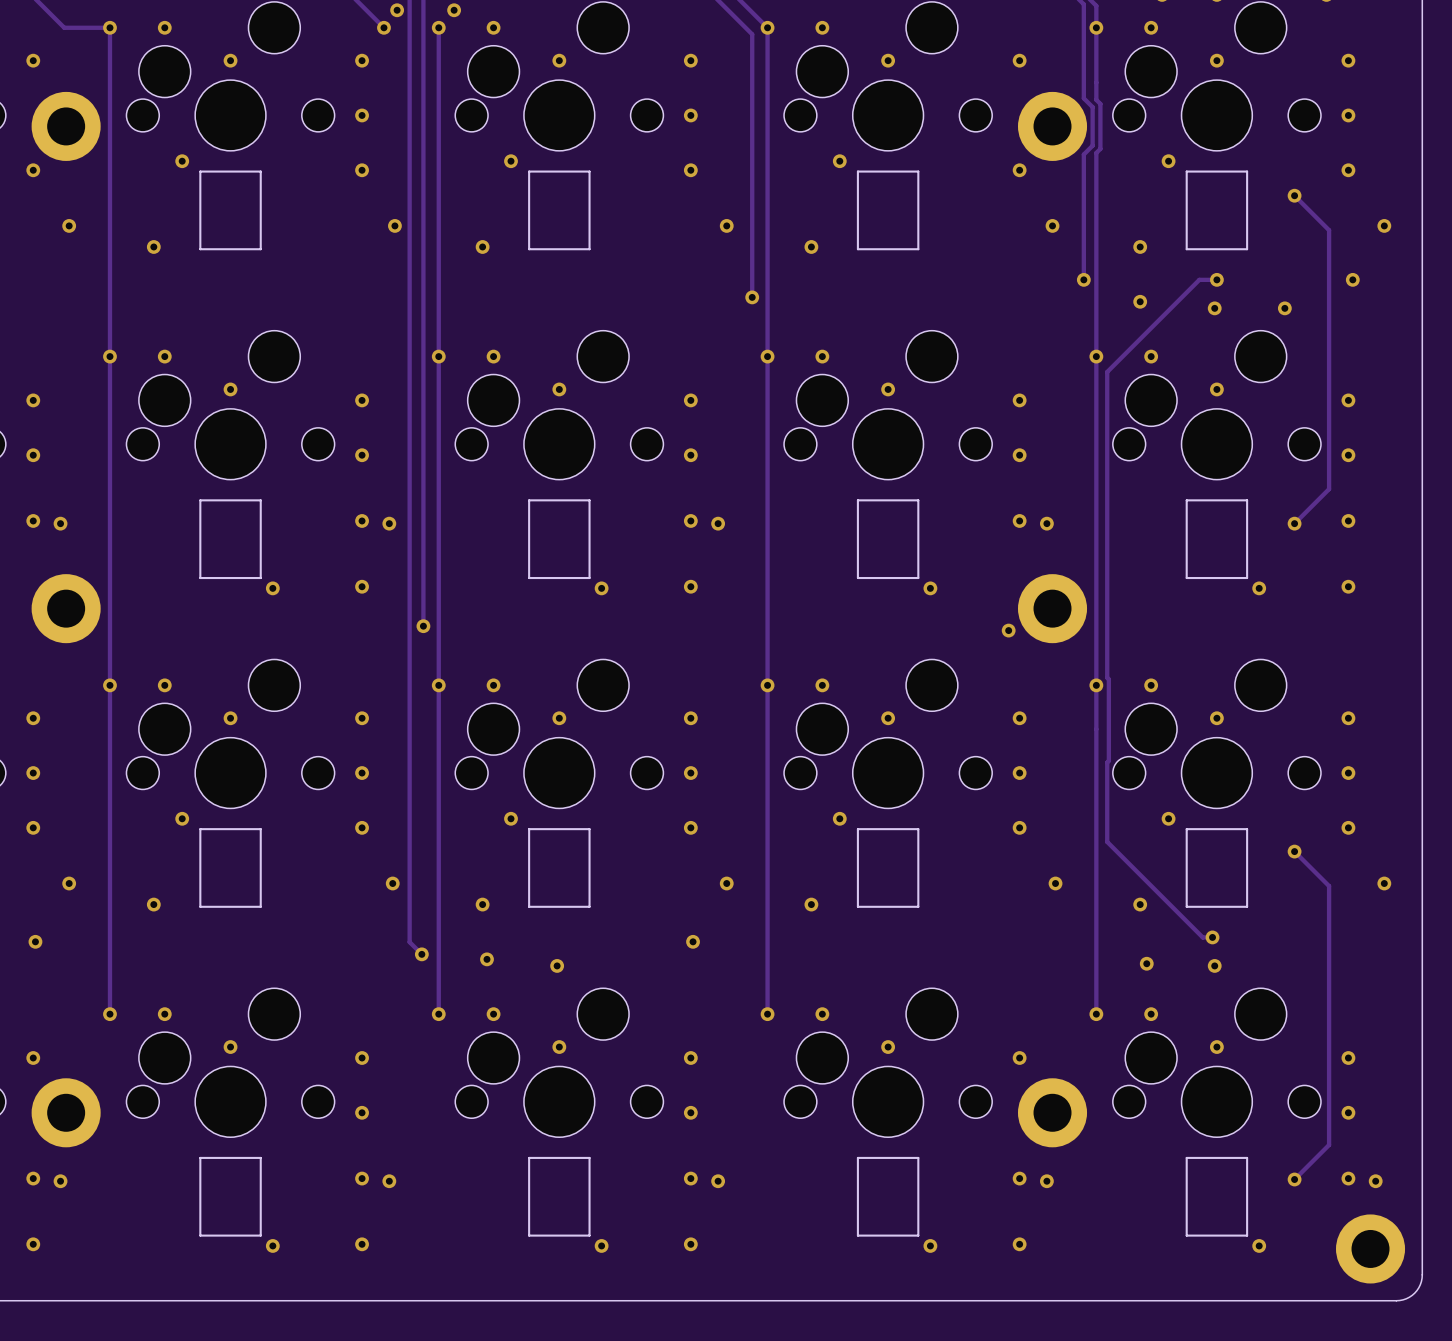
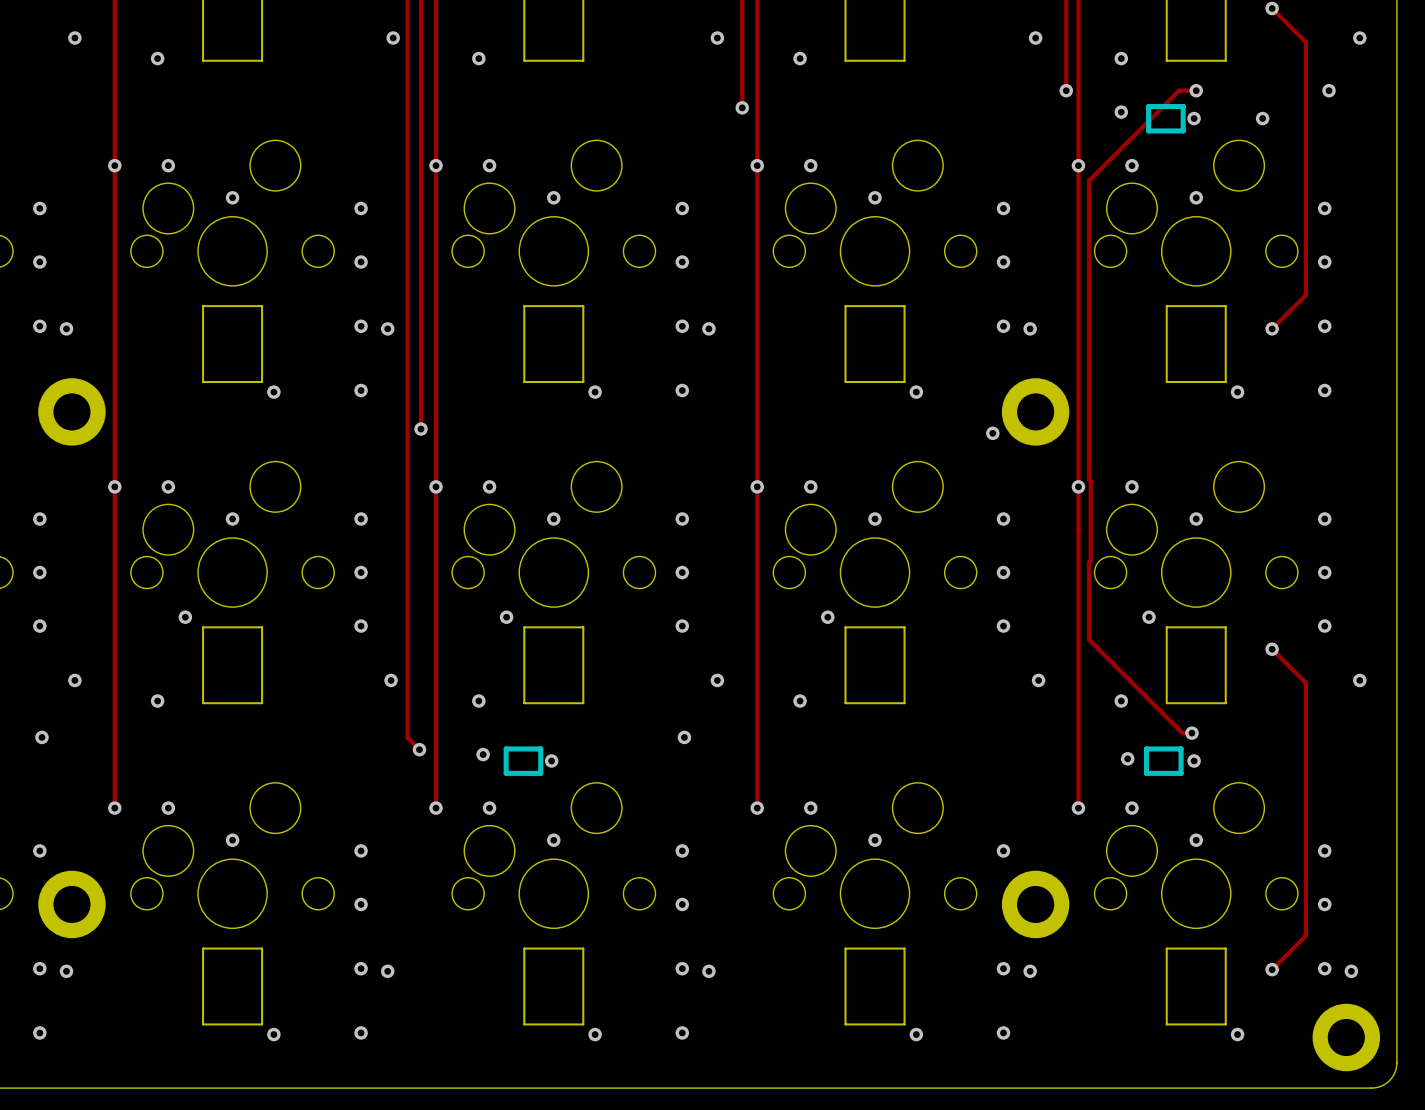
part: none -> (1165, 118)
part: none -> (523, 761)
part: none -> (1163, 761)

